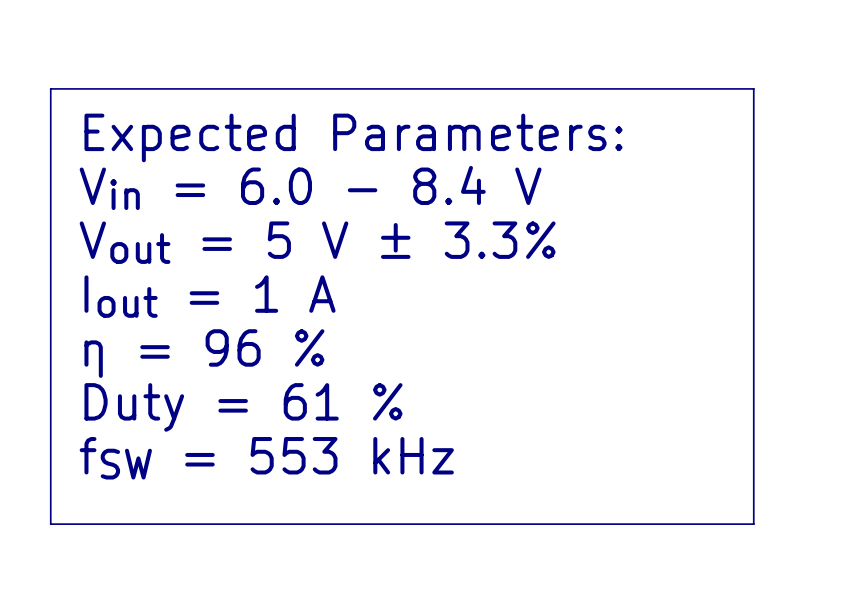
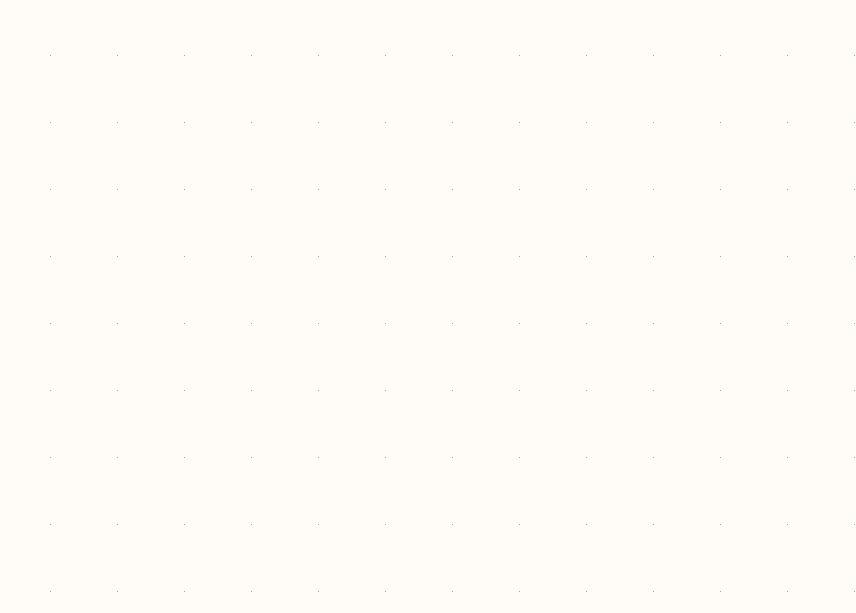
line: (50, 88) (753, 88) (753, 524) (50, 524) (50, 88) -> none
text: Expected Parameters: (353, 137) -> none
text: Vin = 6.0 - 8.4 V (310, 187) -> none
text: Vout = 5 V ± 3.3% (317, 242) -> none
text: Iout = 1 A (210, 296) -> none
text: η = 96 % (204, 353) -> none
text: Duty = 61 % (243, 407) -> none
text: fSW = 553 kHz (266, 458) -> none

